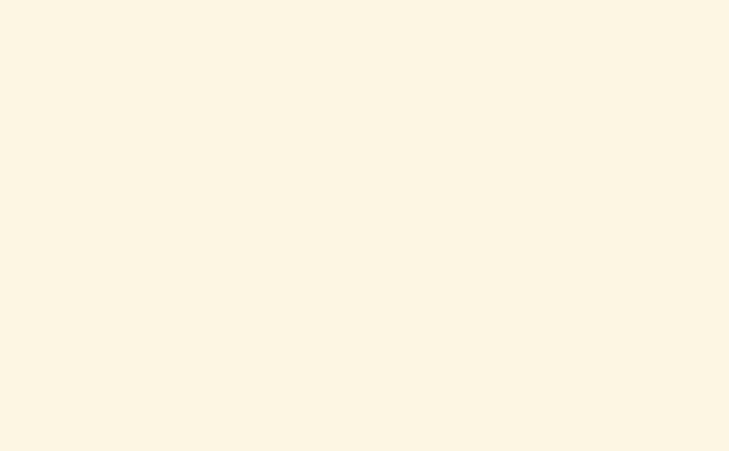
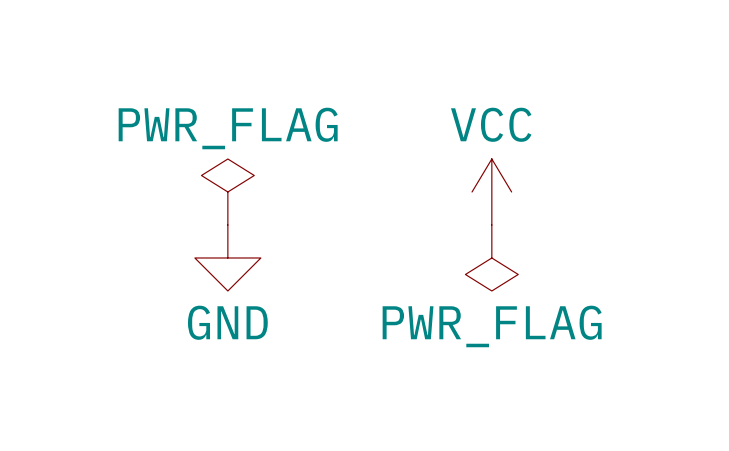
power symbol: none -> PWR_FLAG (227, 192)
power symbol: none -> VCC (491, 192)
power symbol: none -> GND (227, 257)
power symbol: none -> PWR_FLAG (491, 257)

